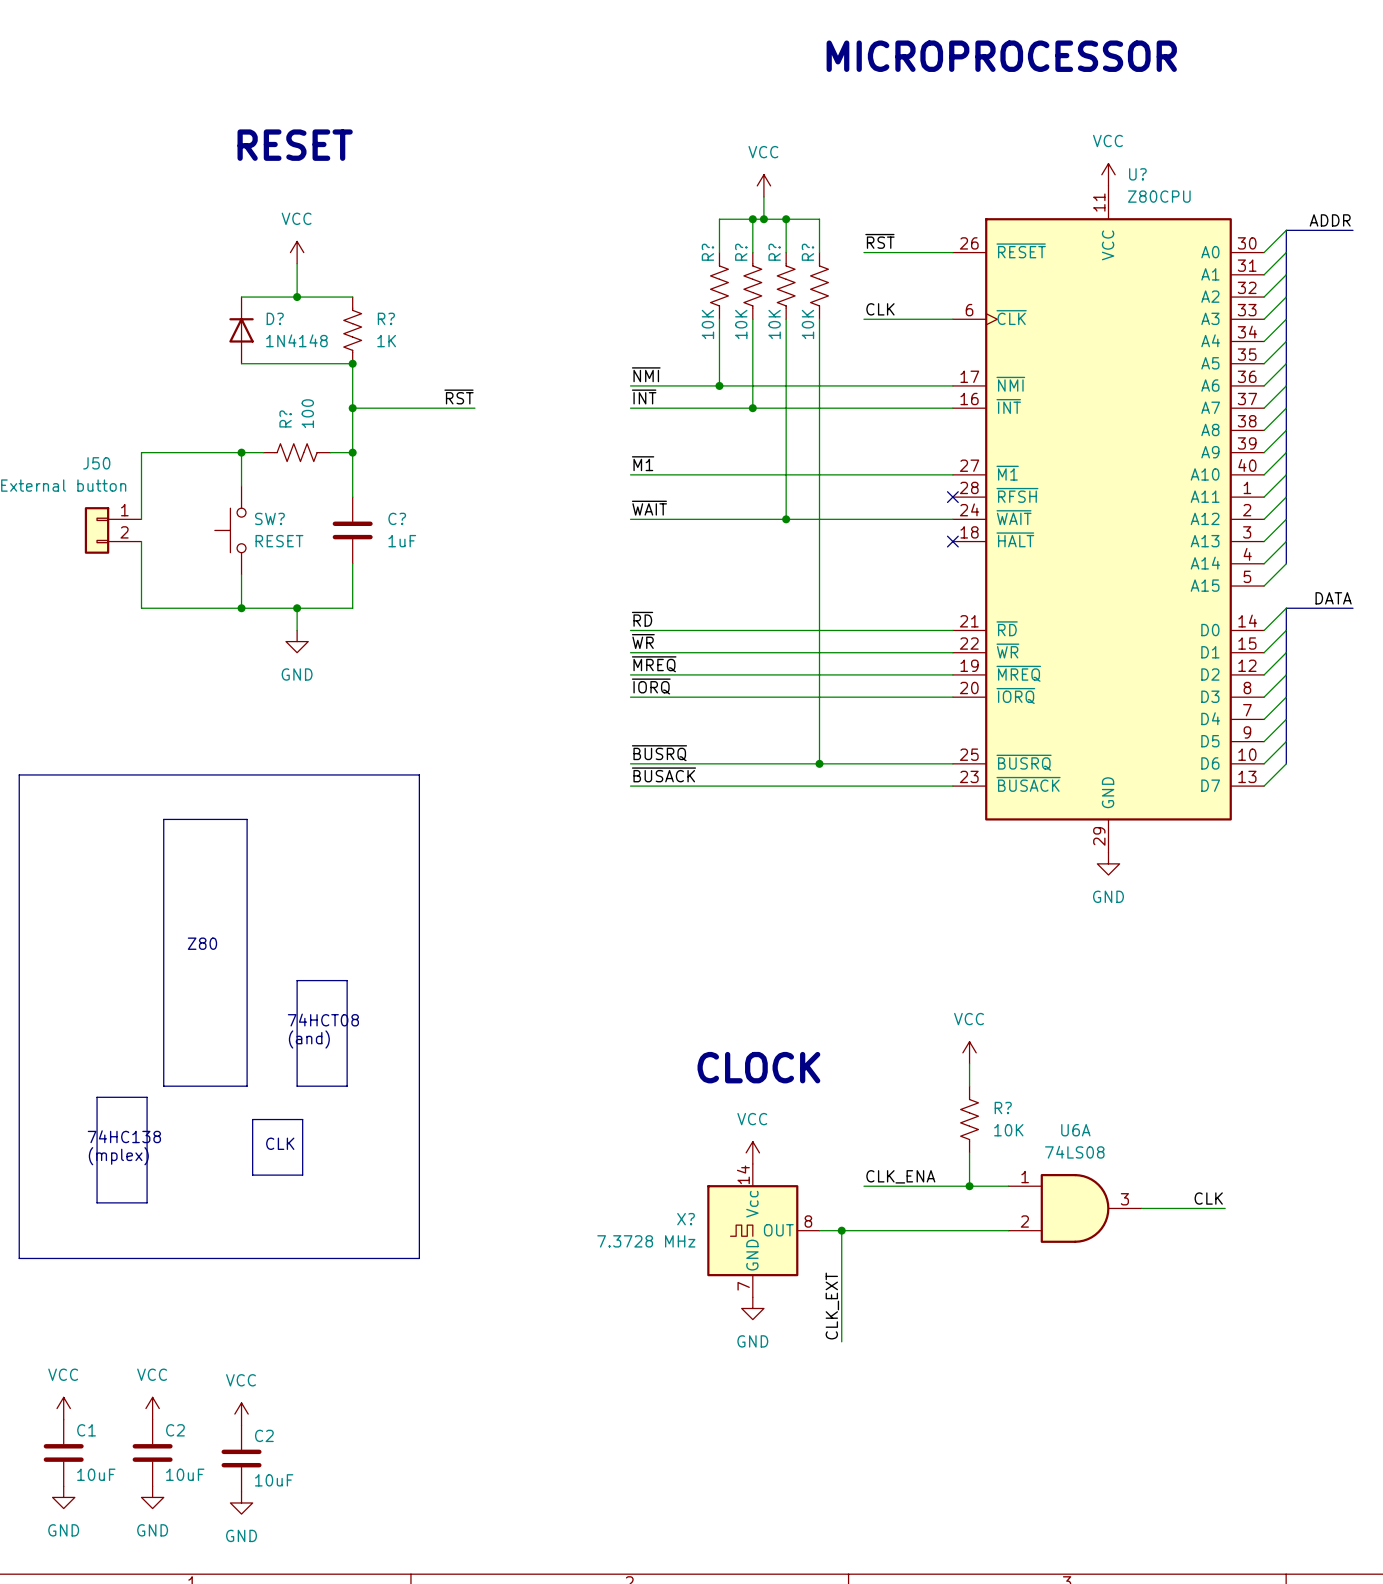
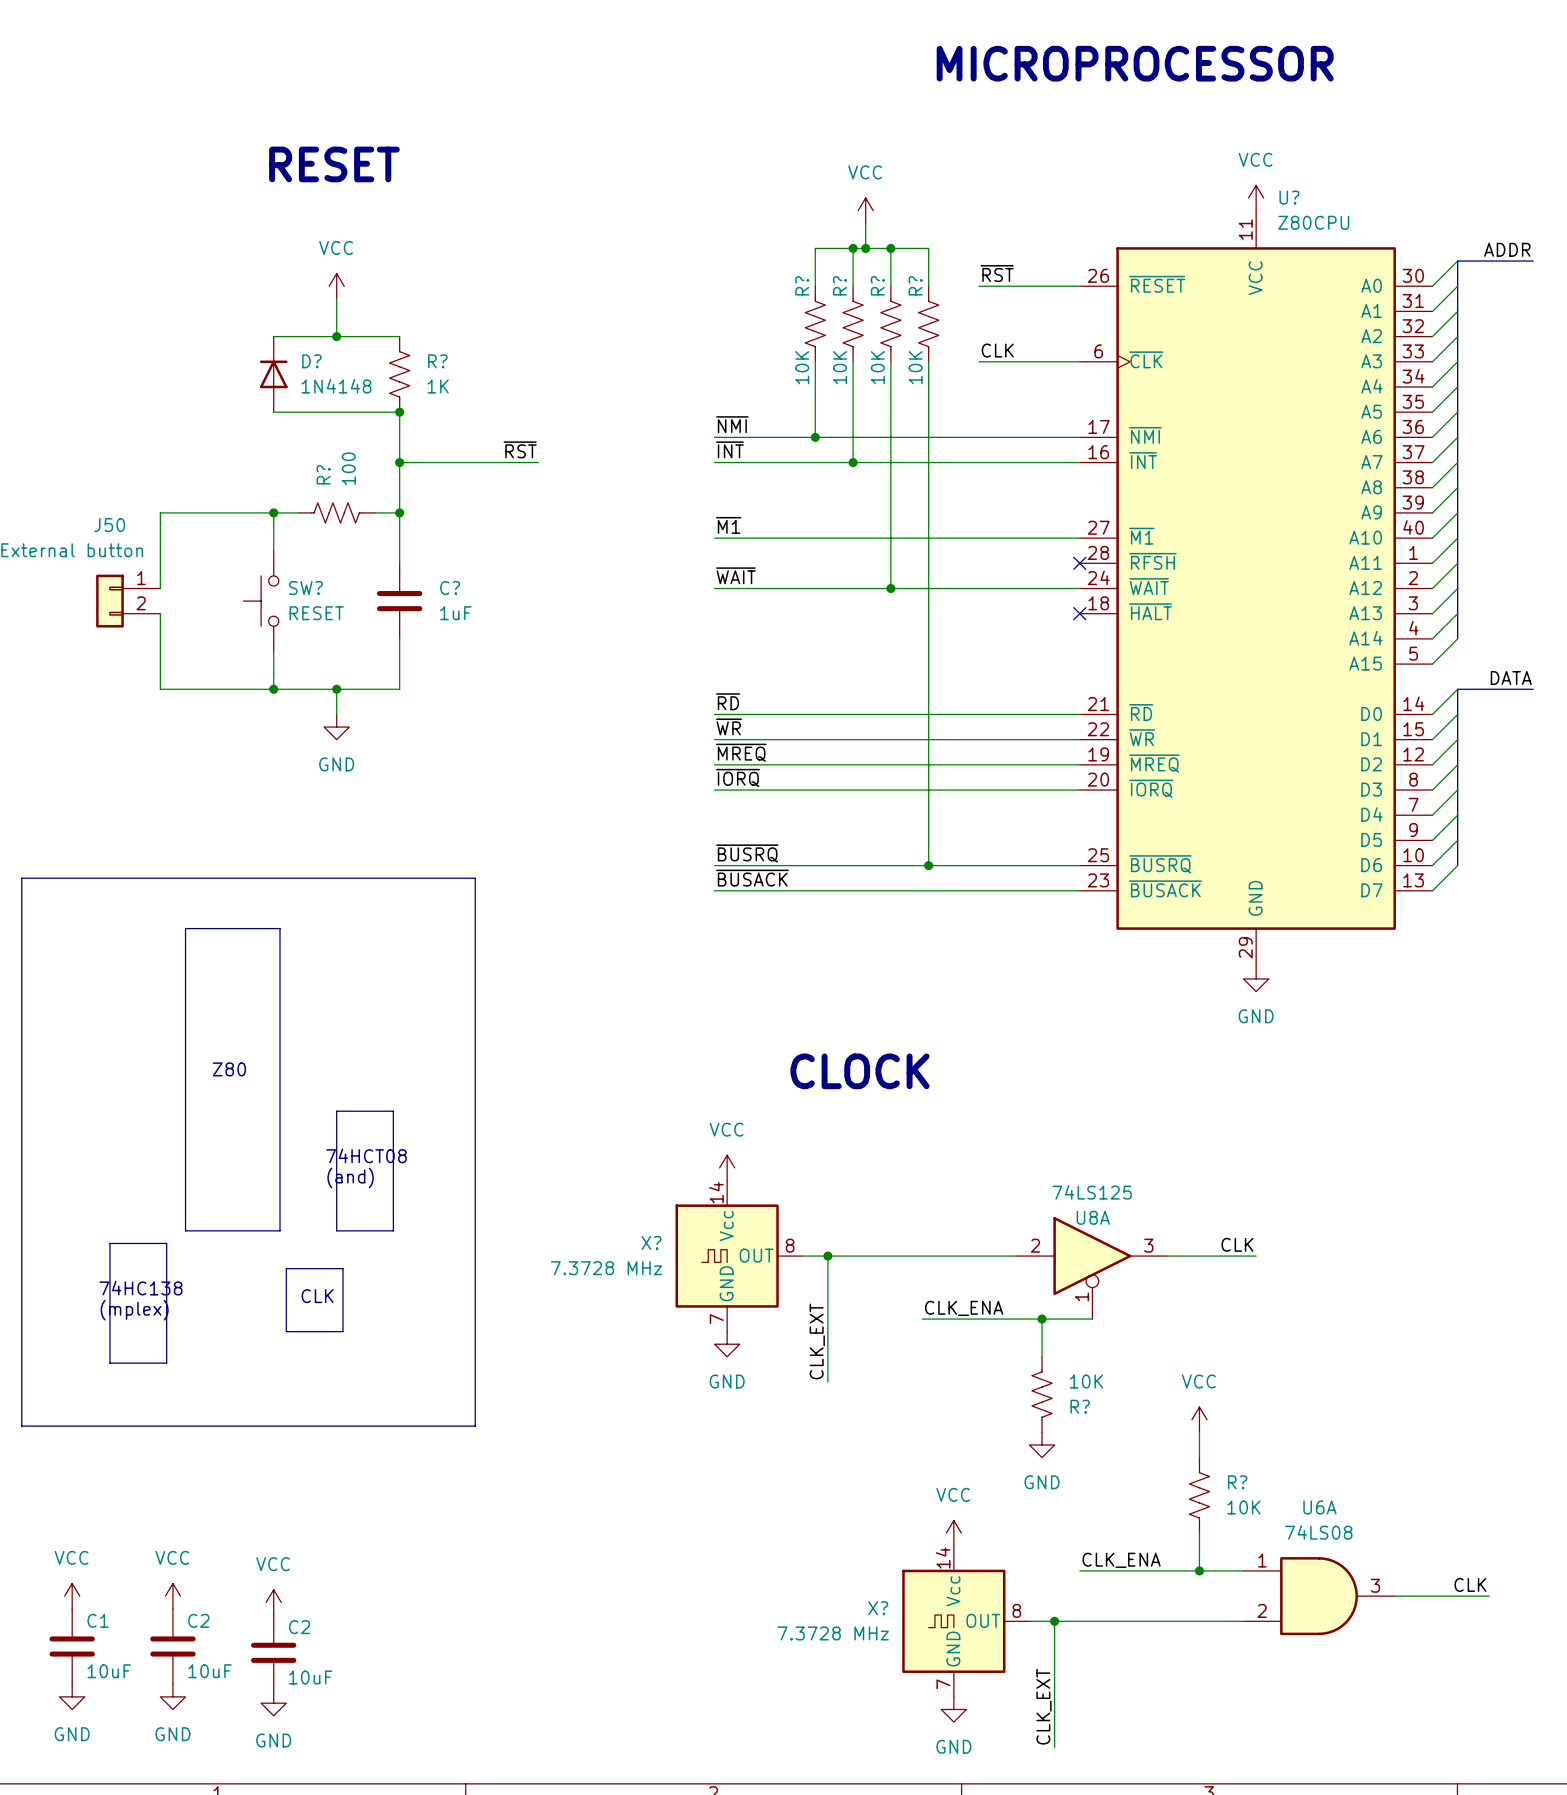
power symbol: none -> VCC (727, 1167)
power symbol: VCC (969, 1052) -> none
wire: (969, 1063) (969, 1086) -> none
text position: CLOCK (758, 1067) -> CLOCK (859, 1071)
label: none -> CLK (1237, 1244)
X?: none -> 7.3728 MHz (739, 1256)
junction: none -> (827, 1256)
wire: none -> (1167, 1256) (1256, 1256)
U8A: none -> 74LS125 (1092, 1268)
R?: 10K (969, 1119) -> none
power symbol: VCC (752, 1152) -> none
wire: (969, 1152) (969, 1186) -> (1042, 1319) (1042, 1356)
wire: none -> (922, 1319) (1092, 1319)
junction: none -> (1042, 1319)
label position: CLK_ENA (900, 1176) -> CLK_ENA (964, 1308)
label: none -> CLK_EXT (817, 1341)
power symbol: none -> GND (727, 1344)
wire: (863, 1186) (1008, 1186) -> none
junction: (969, 1186) -> none
label: CLK (1208, 1198) -> none
U6A position: (1075, 1208) -> (1319, 1596)
wire: (1141, 1208) (1225, 1208) -> none
X?: 7.3728 MHz (763, 1230) -> none
wire: (819, 1230) (1008, 1230) -> (802, 1256) (1016, 1256)
wire: (841, 1230) (841, 1341) -> (827, 1256) (827, 1382)
junction: (841, 1230) -> none
R?: none -> 10K (1042, 1394)
power symbol: none -> VCC (1199, 1419)
wire: none -> (1199, 1432) (1199, 1457)
power symbol: none -> GND (1042, 1444)
label: CLK_EXT (832, 1306) -> none
power symbol: GND (752, 1308) -> none
R?: none -> 10K (1199, 1495)
power symbol: none -> VCC (953, 1533)
wire: none -> (1199, 1533) (1199, 1570)
label: none -> CLK_ENA (1121, 1560)
wire: none -> (1079, 1570) (1243, 1570)
junction: none -> (1199, 1570)
label: none -> CLK (1470, 1584)
wire: none -> (1394, 1596) (1489, 1596)
X?: none -> 7.3728 MHz (965, 1621)
wire: none -> (1029, 1621) (1243, 1621)
wire: none -> (1054, 1621) (1054, 1747)
junction: none -> (1054, 1621)
label: none -> CLK_EXT (1043, 1706)
power symbol: none -> GND (953, 1709)

